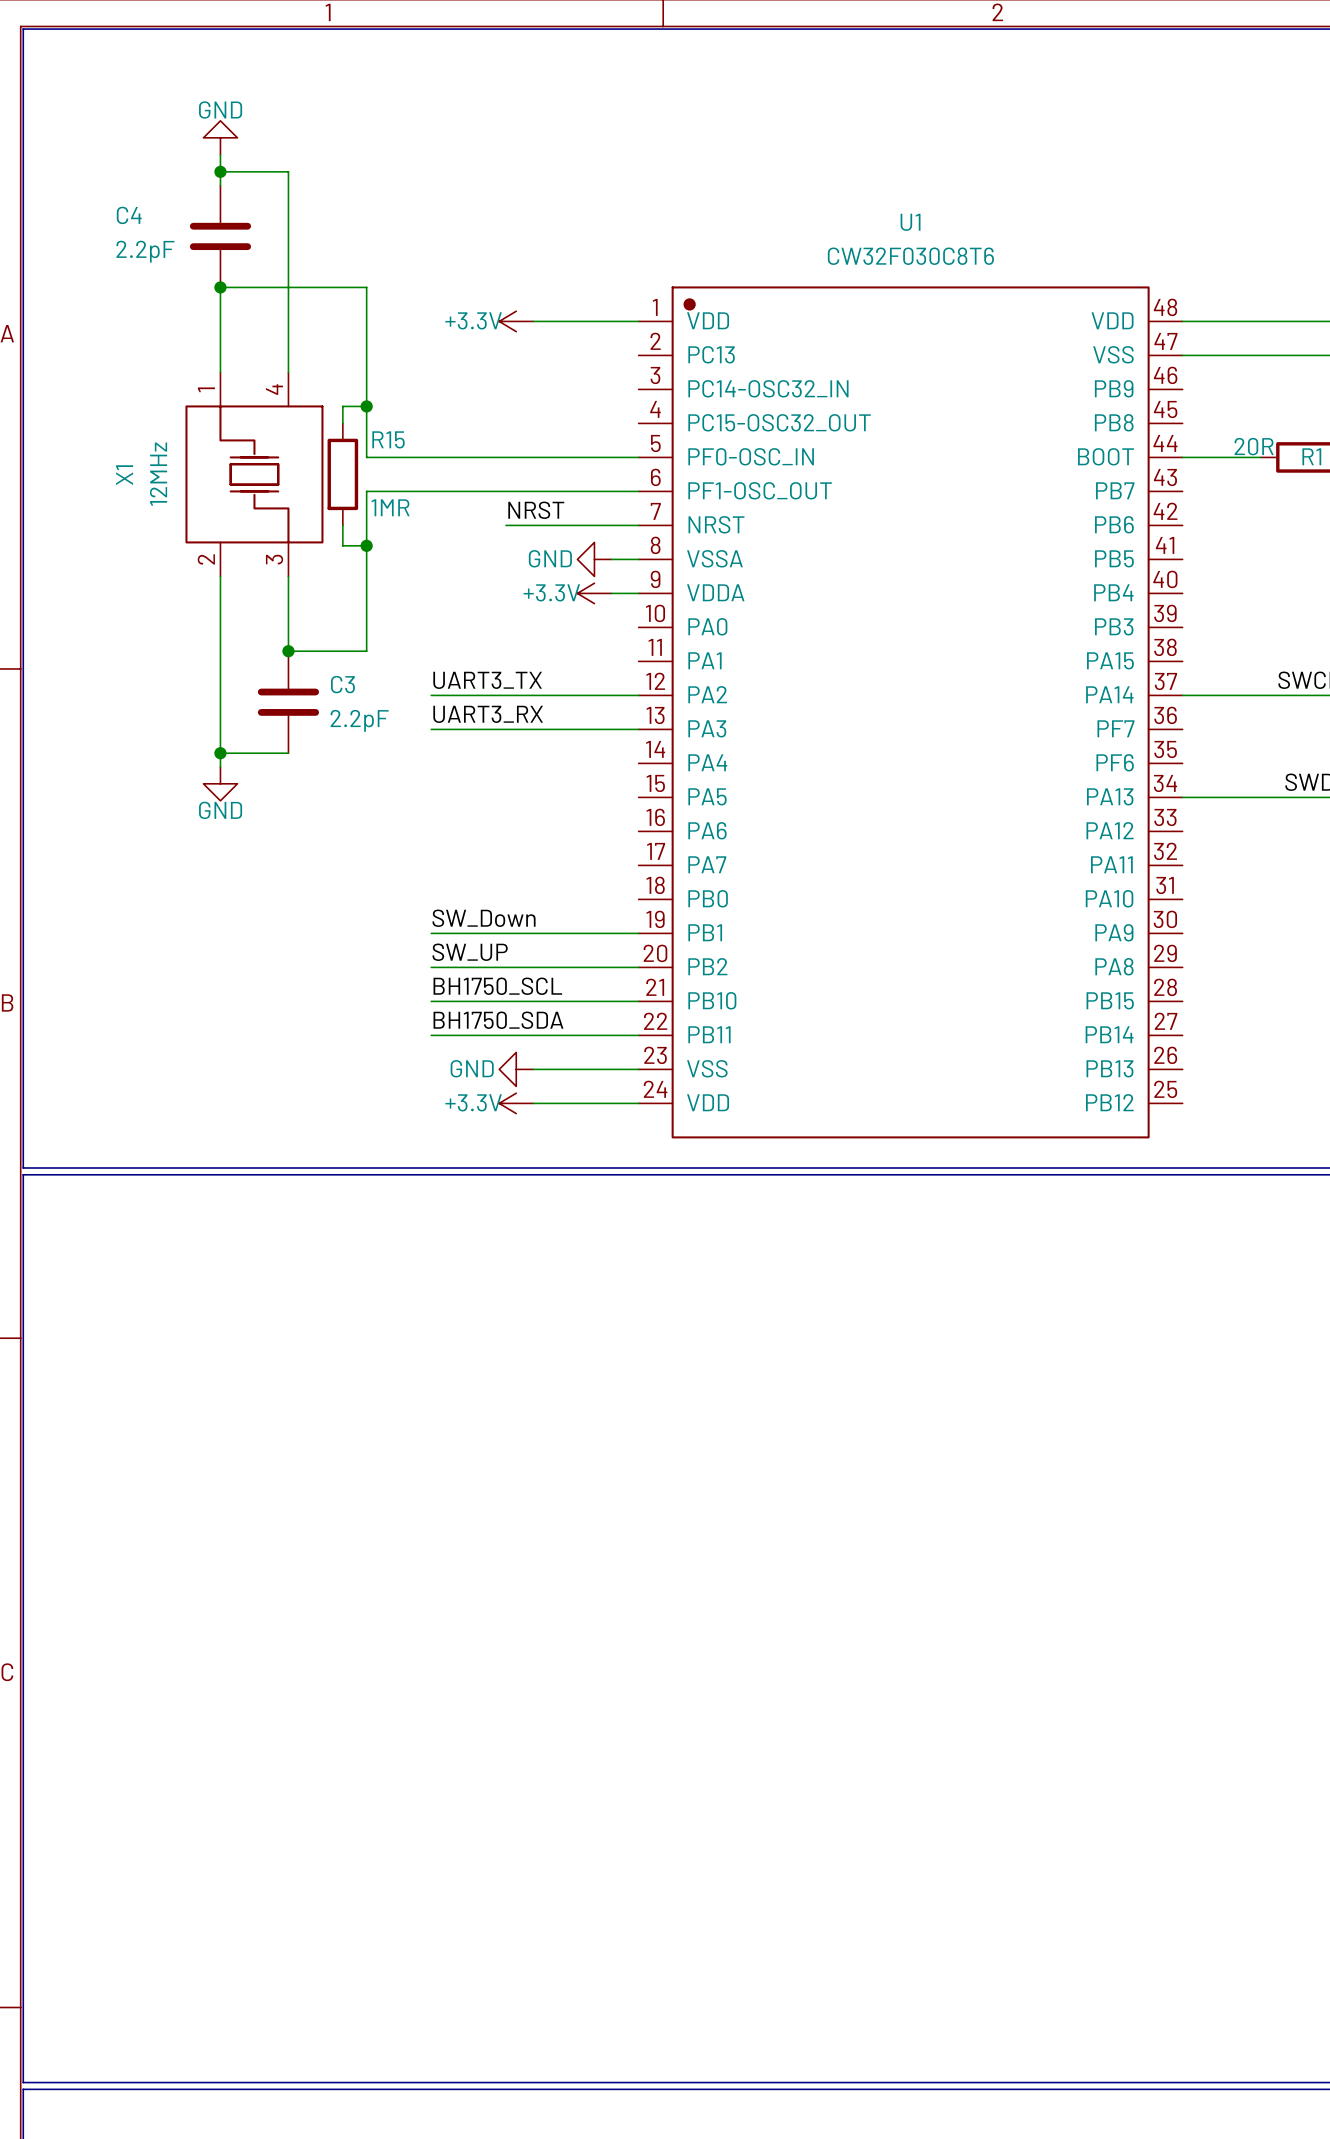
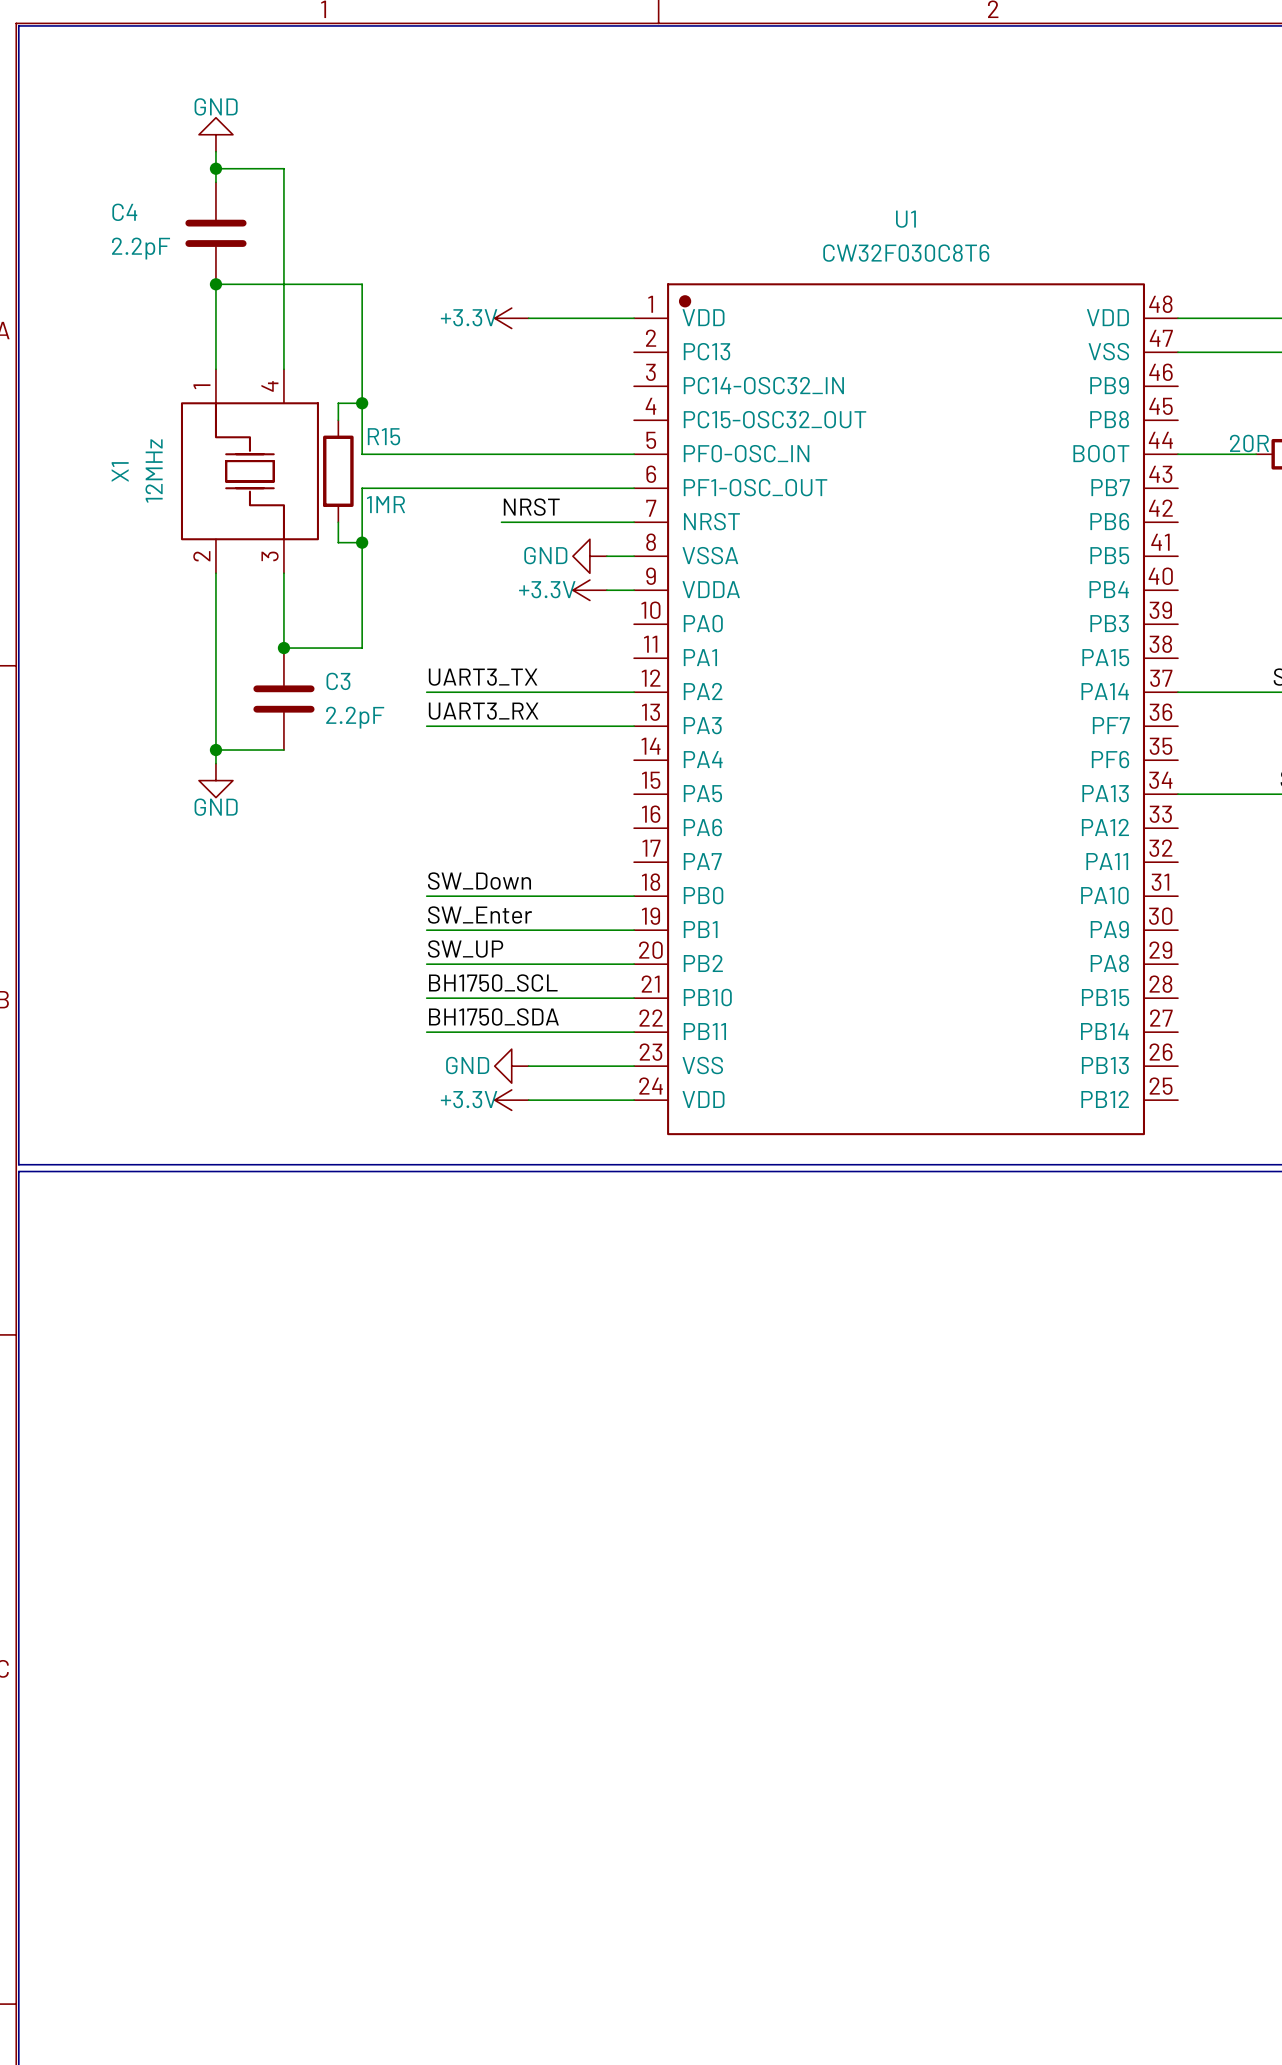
label: none -> SW_Down (479, 881)
wire: none -> (426, 896) (634, 896)
label: SW_Down (484, 918) -> SW_Enter (480, 915)

